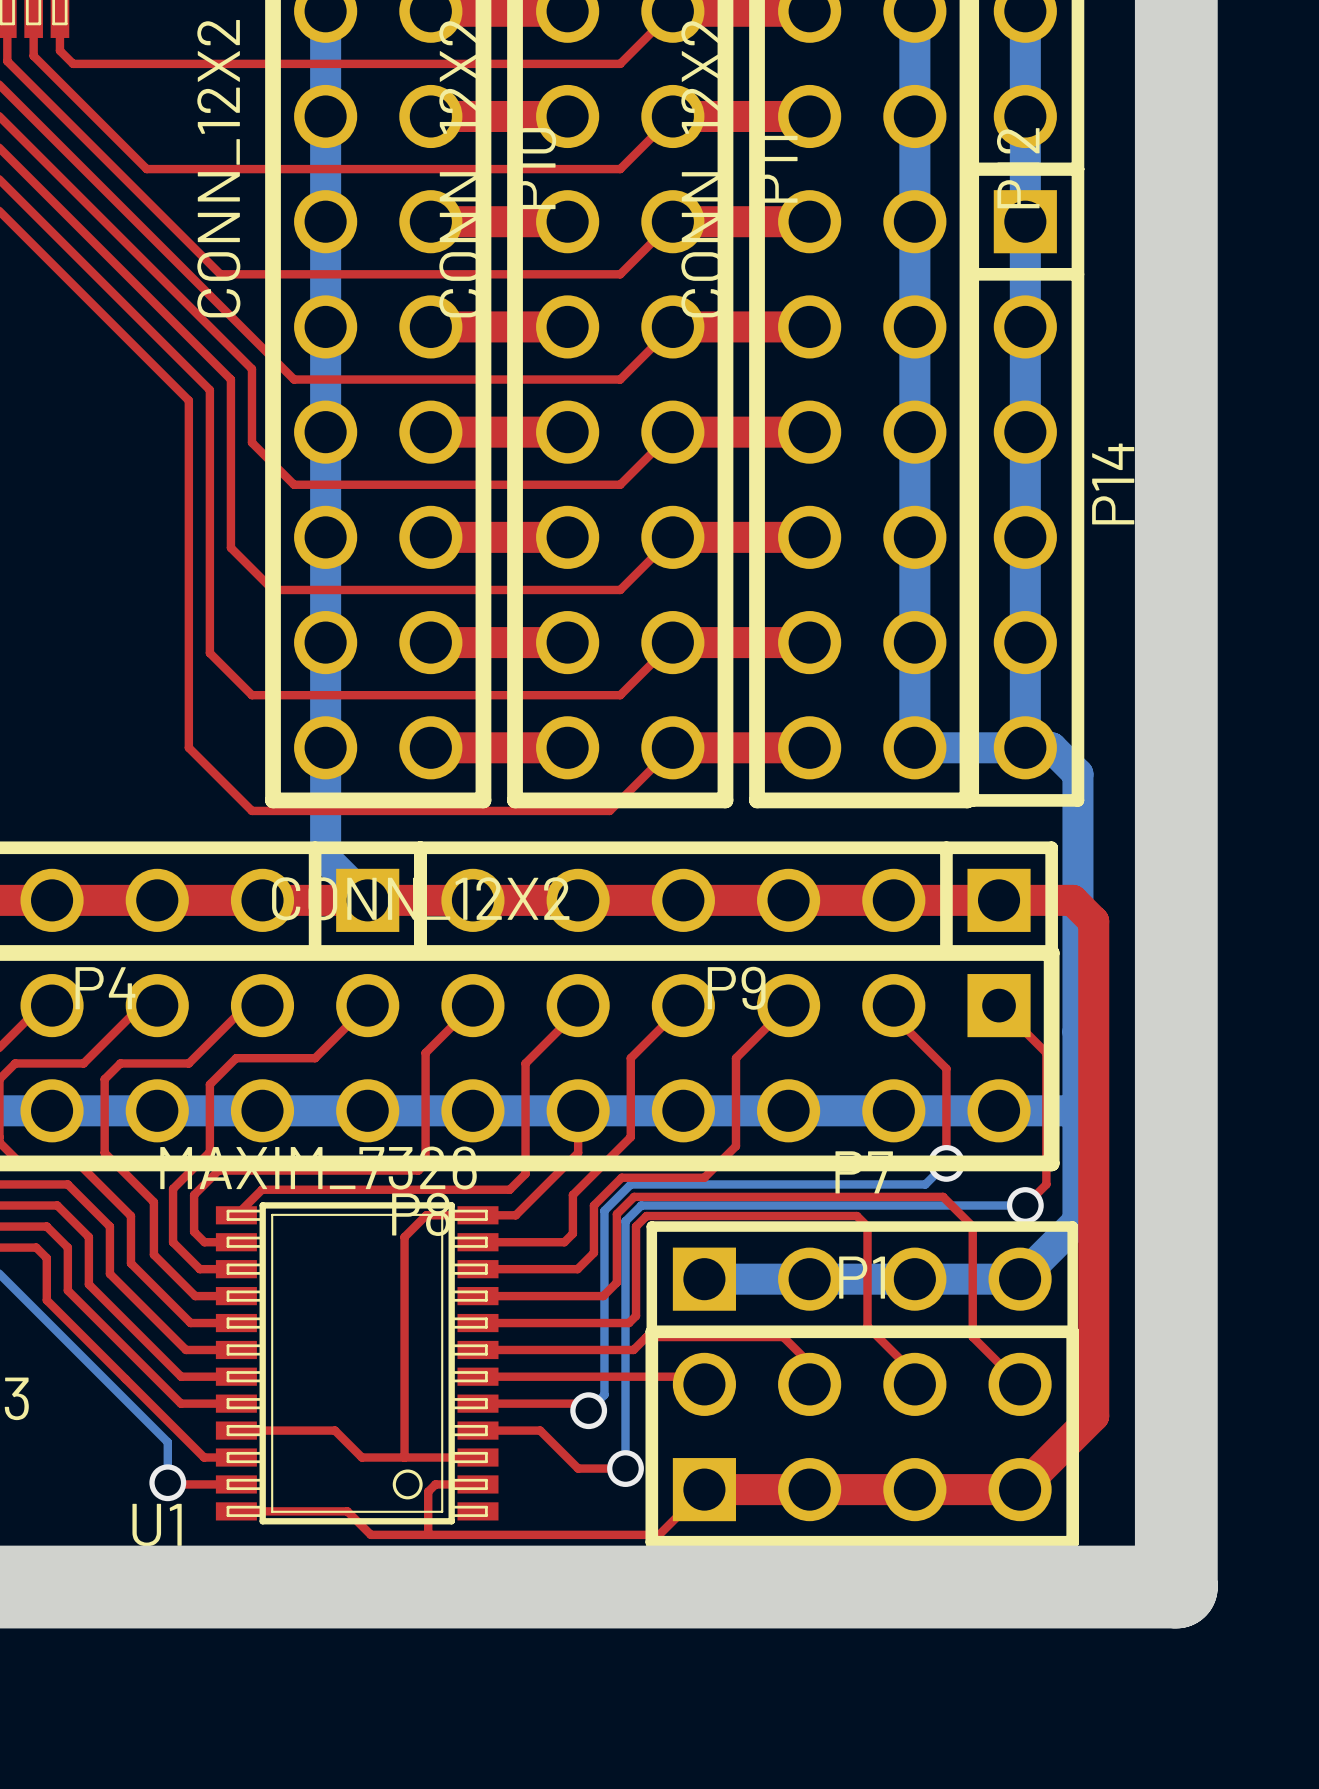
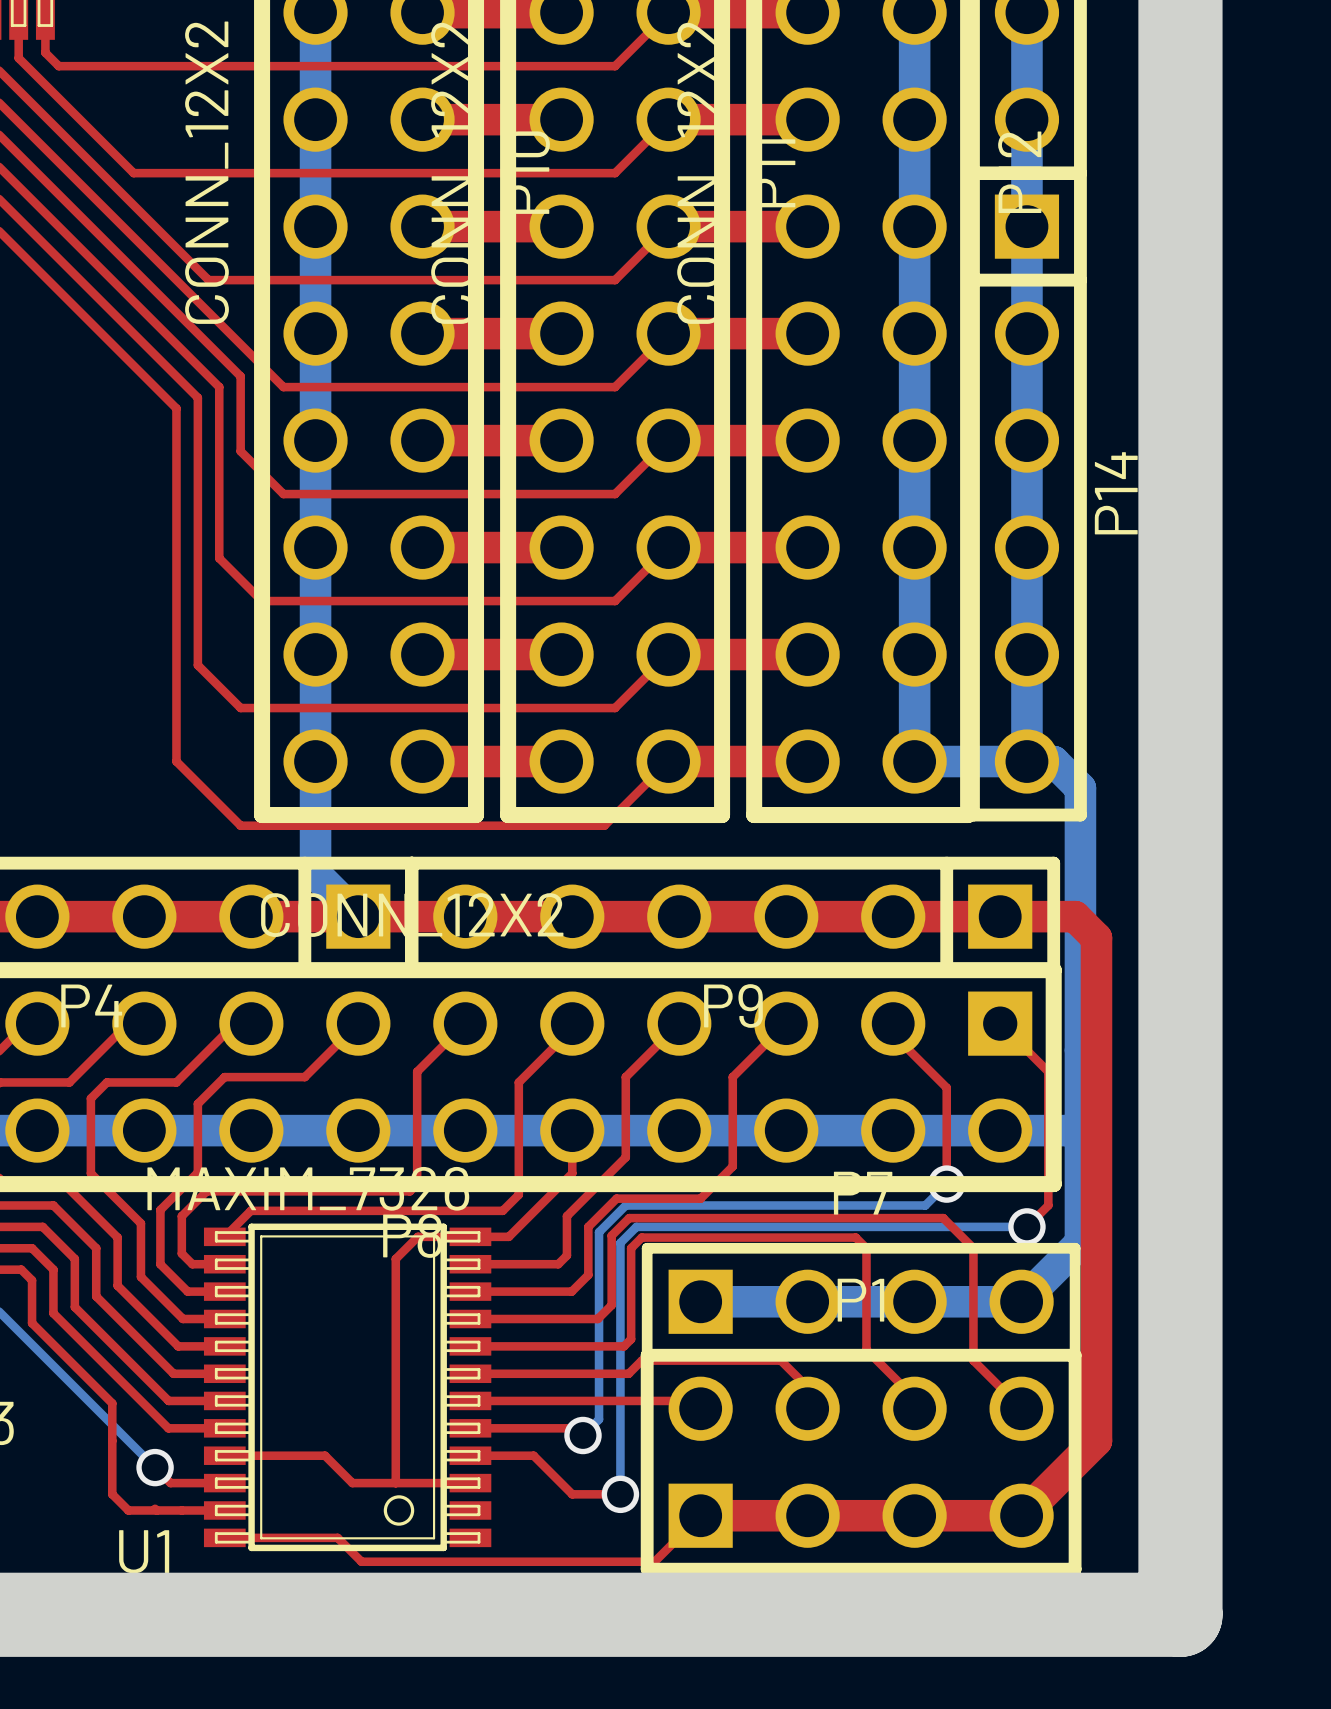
top track: (125, 1379) (204, 1457) -> (112, 1403) (112, 1494) (128, 1510) (156, 1510)
bottom track: (167, 1442) (167, 1482) -> none
top track: none -> (155, 1467) (170, 1483) (191, 1483)
via position: (167, 1482) -> (155, 1467)
top track: (477, 1484) (435, 1484) (428, 1491) (428, 1534) -> none

